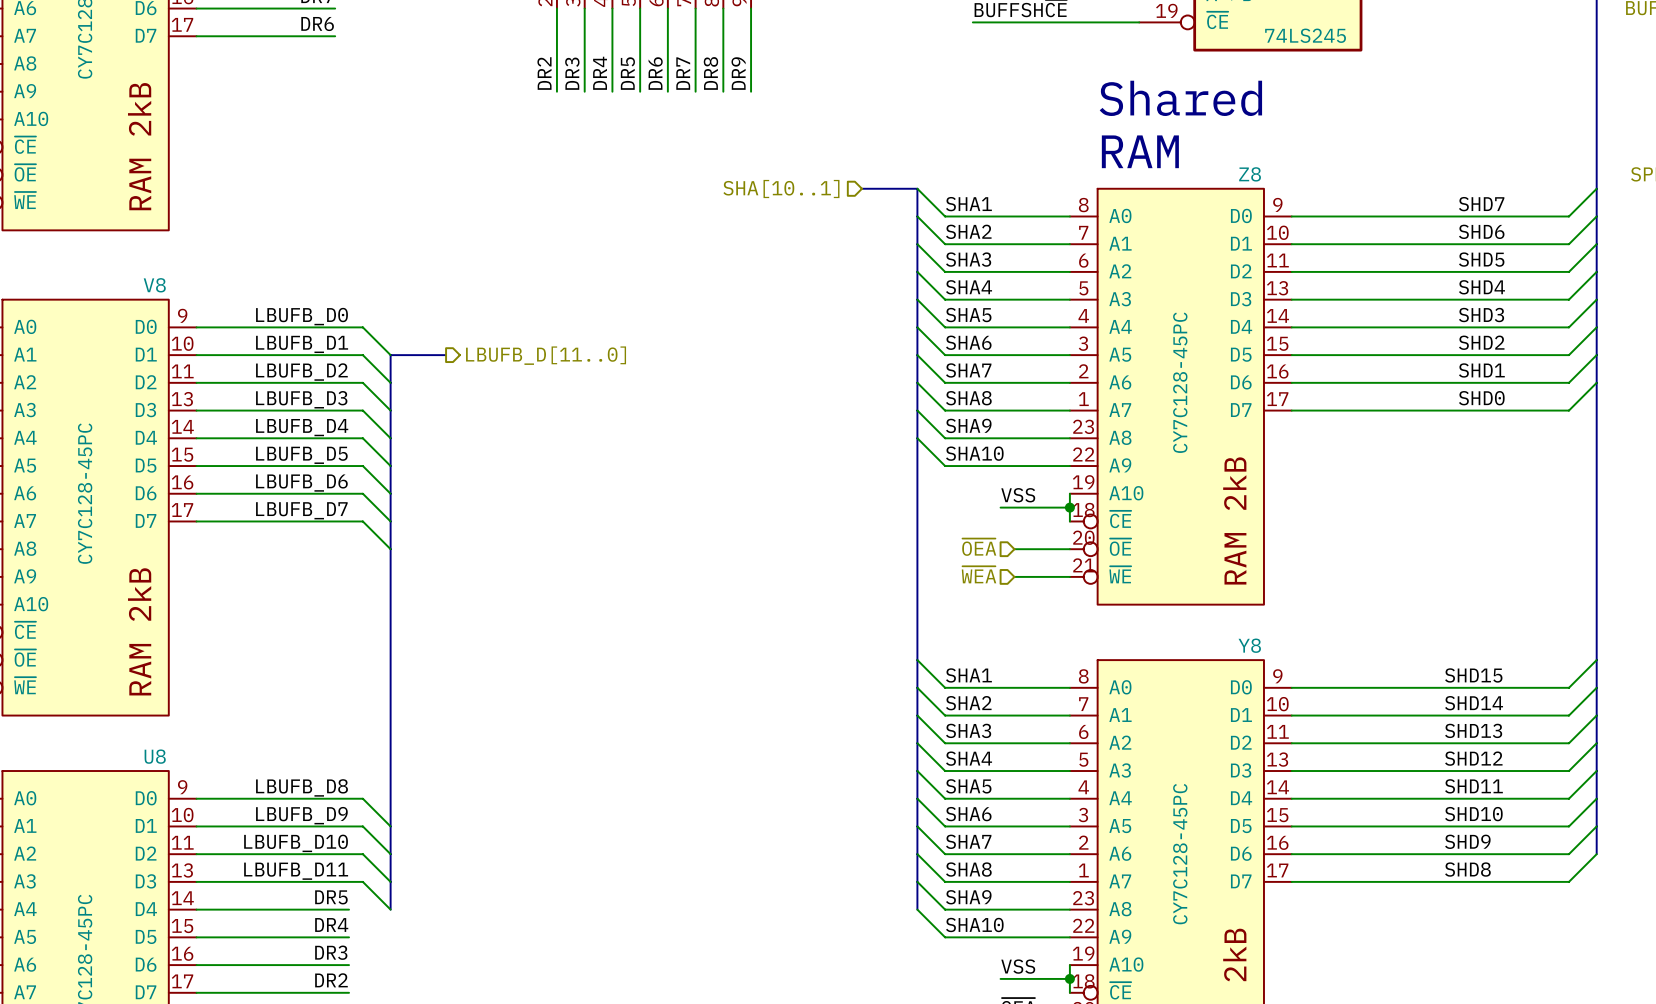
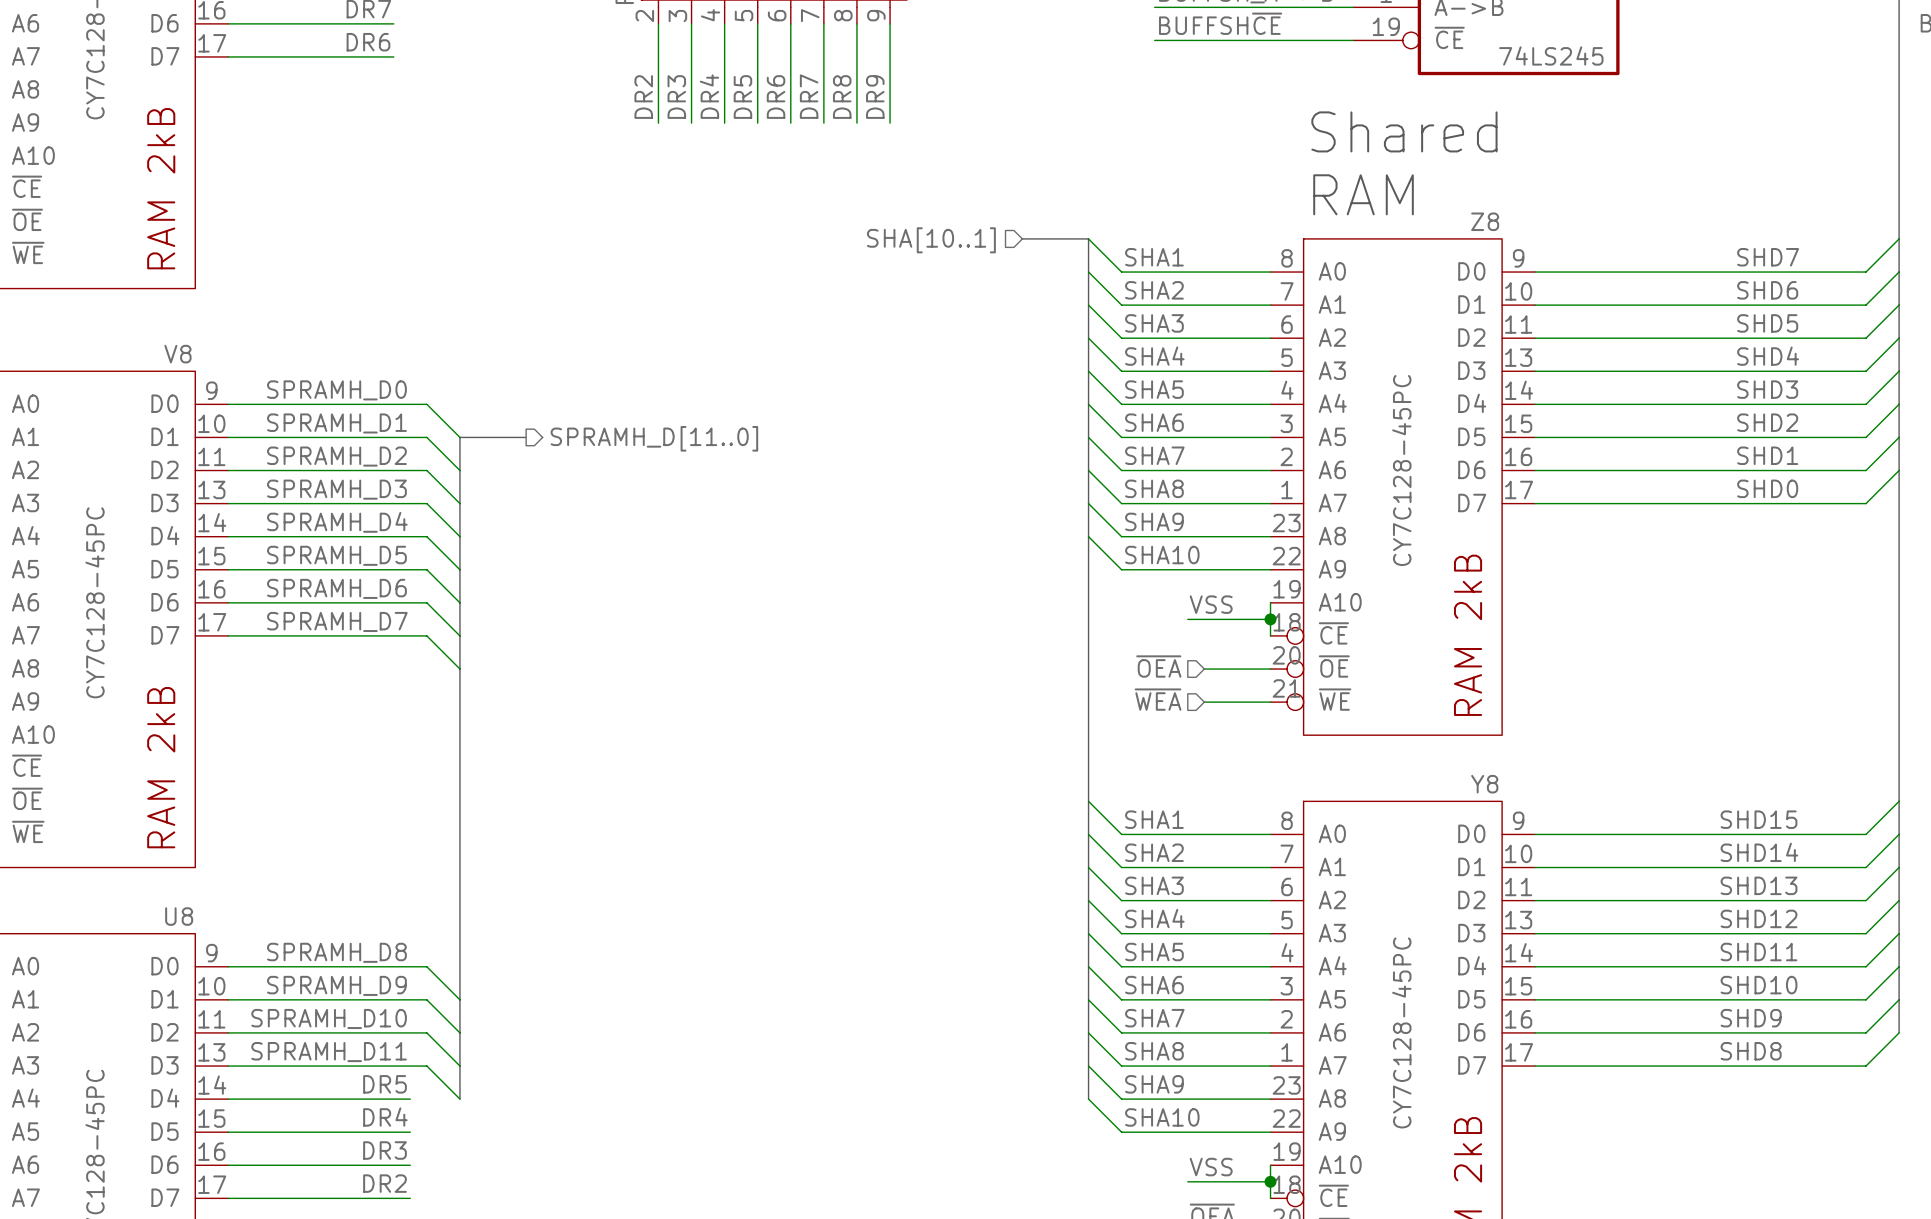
label: LBUFB_D0 (301, 316) -> SPRAMH_D0 (336, 390)
label: LBUFB_D1 (302, 344) -> SPRAMH_D1 (336, 423)
hierarchical label: LBUFB_D[11..0] (546, 355) -> SPRAMH_D[11..0] (654, 438)
label: LBUFB_D2 (301, 372) -> SPRAMH_D2 (336, 456)
label: LBUFB_D3 (301, 399) -> SPRAMH_D3 (336, 489)
label: LBUFB_D4 (302, 427) -> SPRAMH_D4 (337, 522)
label: LBUFB_D5 (301, 455) -> SPRAMH_D5 (336, 555)
label: LBUFB_D6 (301, 483) -> SPRAMH_D6 (336, 588)
label: LBUFB_D7 (301, 510) -> SPRAMH_D7 (337, 621)
label: LBUFB_D8 (302, 787) -> SPRAMH_D8 (336, 952)
label: LBUFB_D9 (301, 815) -> SPRAMH_D9 (336, 985)
label: LBUFB_D10 (296, 843) -> SPRAMH_D10 (329, 1018)
label: LBUFB_D11 (296, 871) -> SPRAMH_D11 (329, 1052)

